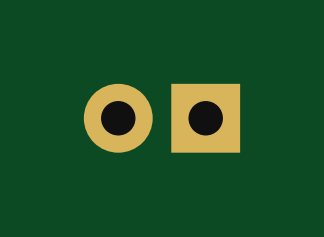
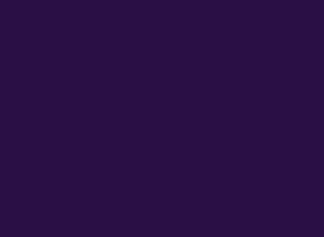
part: (161, 118) -> none

